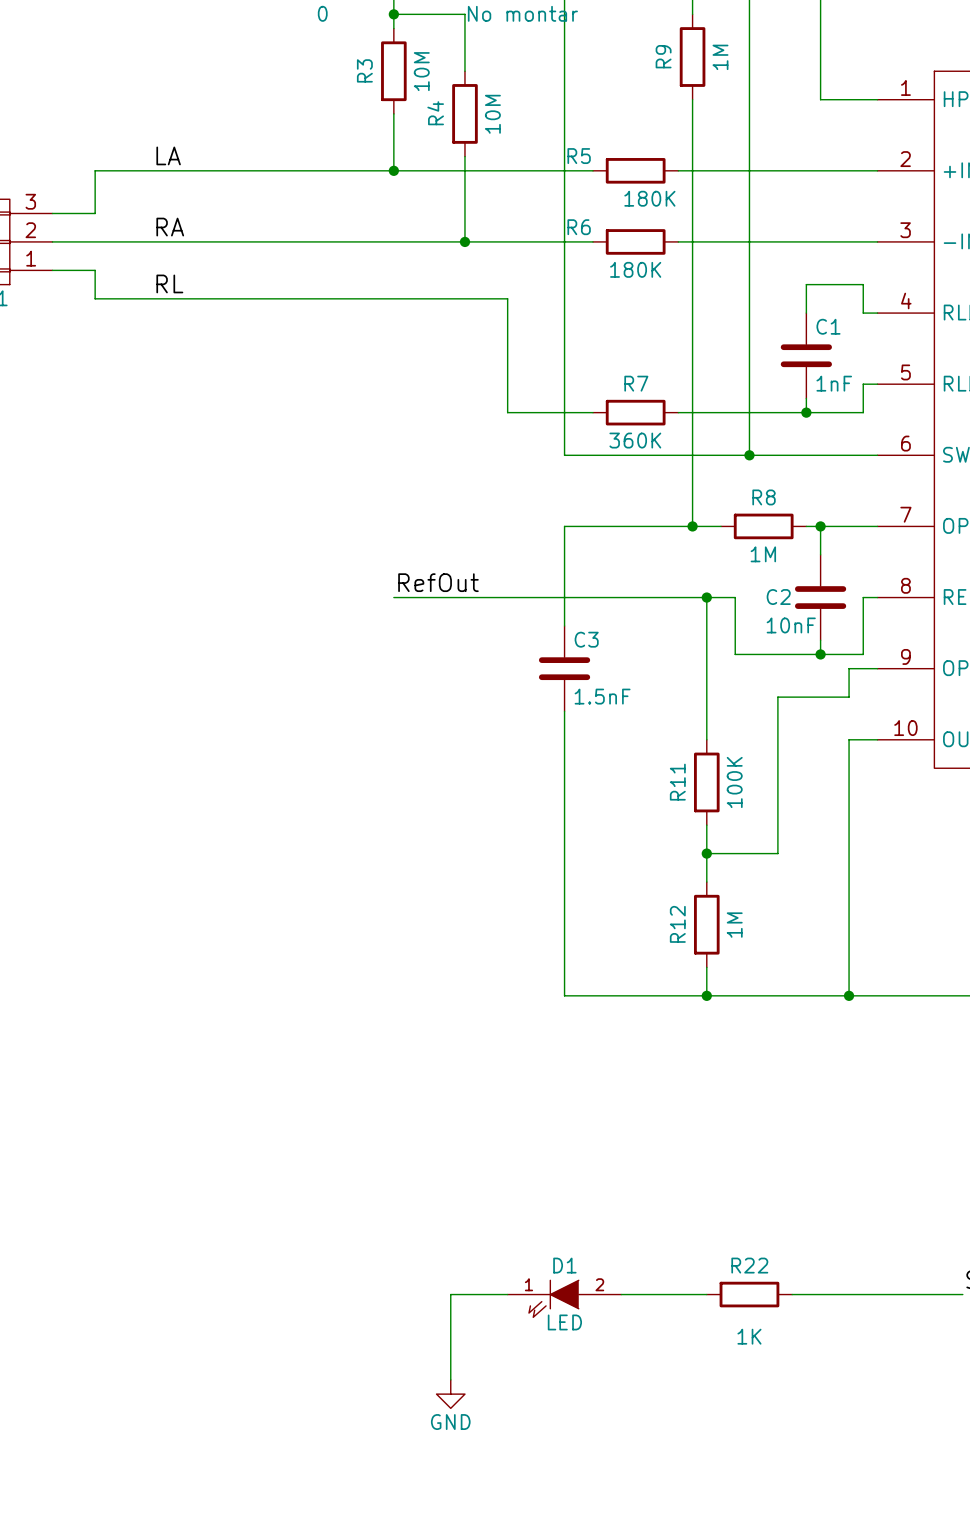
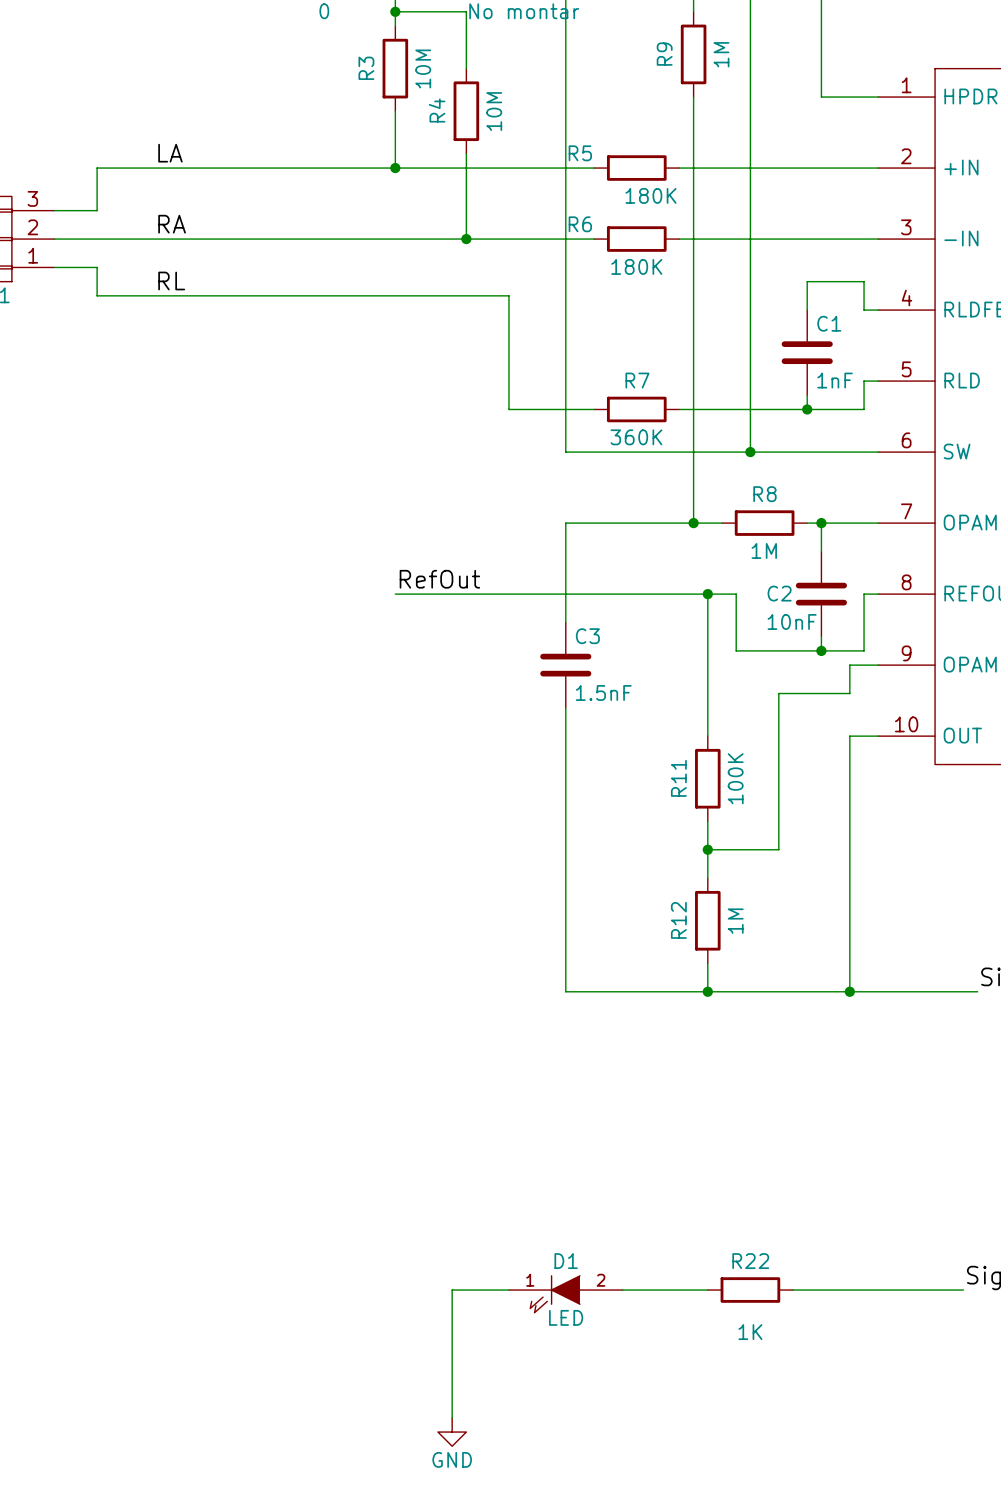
wire: none -> (452, 1375) (452, 1417)
power symbol position: GND (450, 1394) -> GND (452, 1432)

